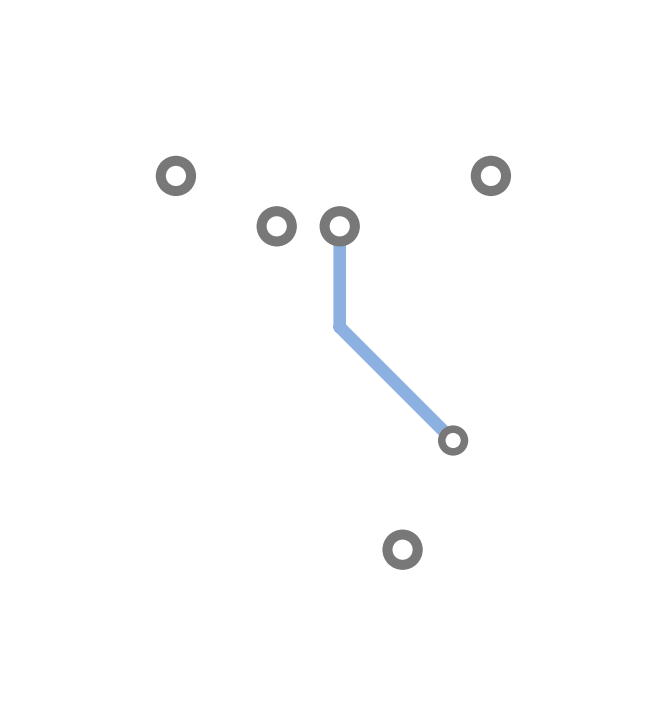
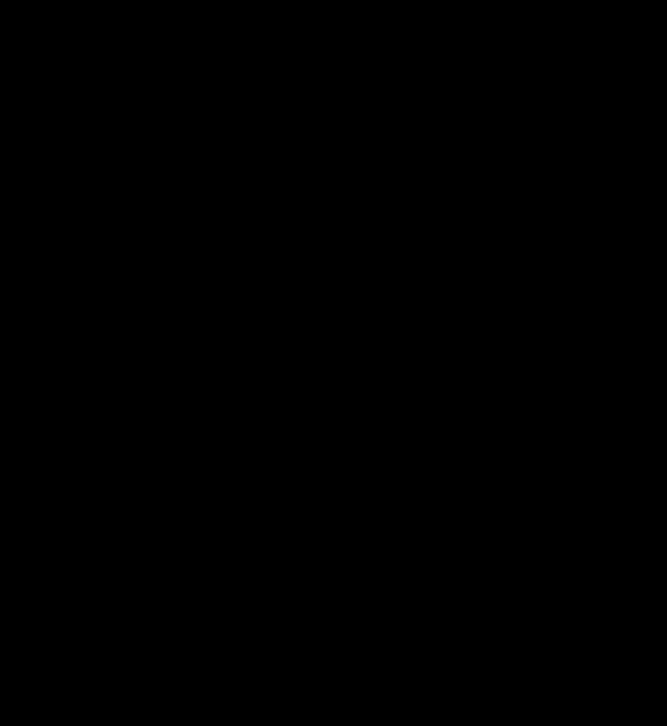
via: (175, 175) -> none
via: (490, 175) -> none
via: (276, 226) -> none
track: (339, 226) (339, 327) (453, 440) -> none
via: (339, 226) -> none
via: (453, 440) -> none
via: (402, 549) -> none

